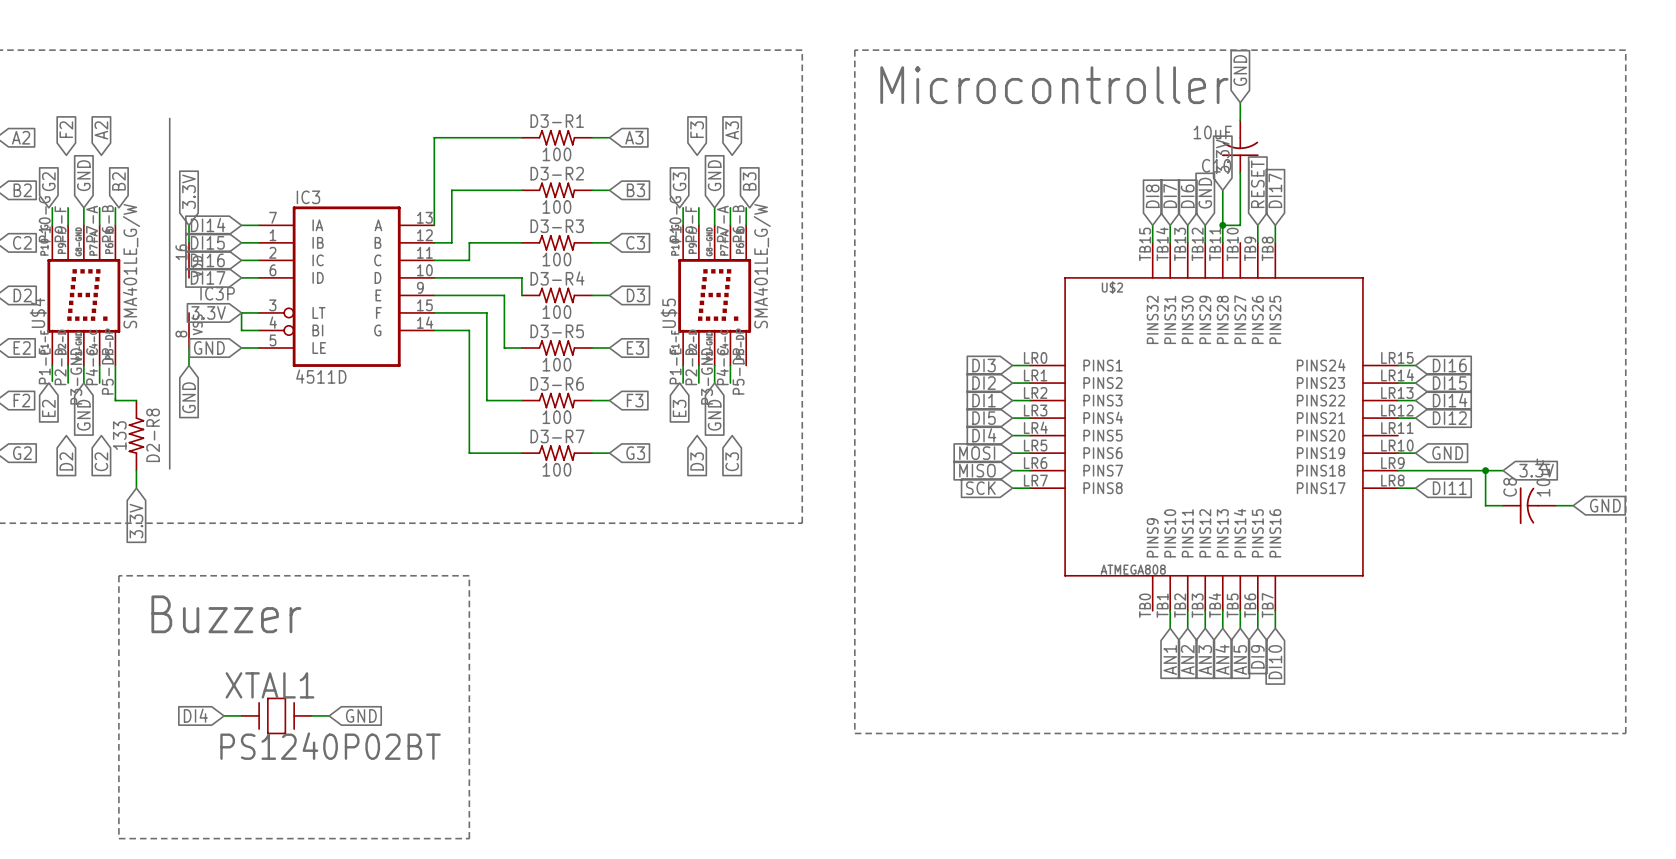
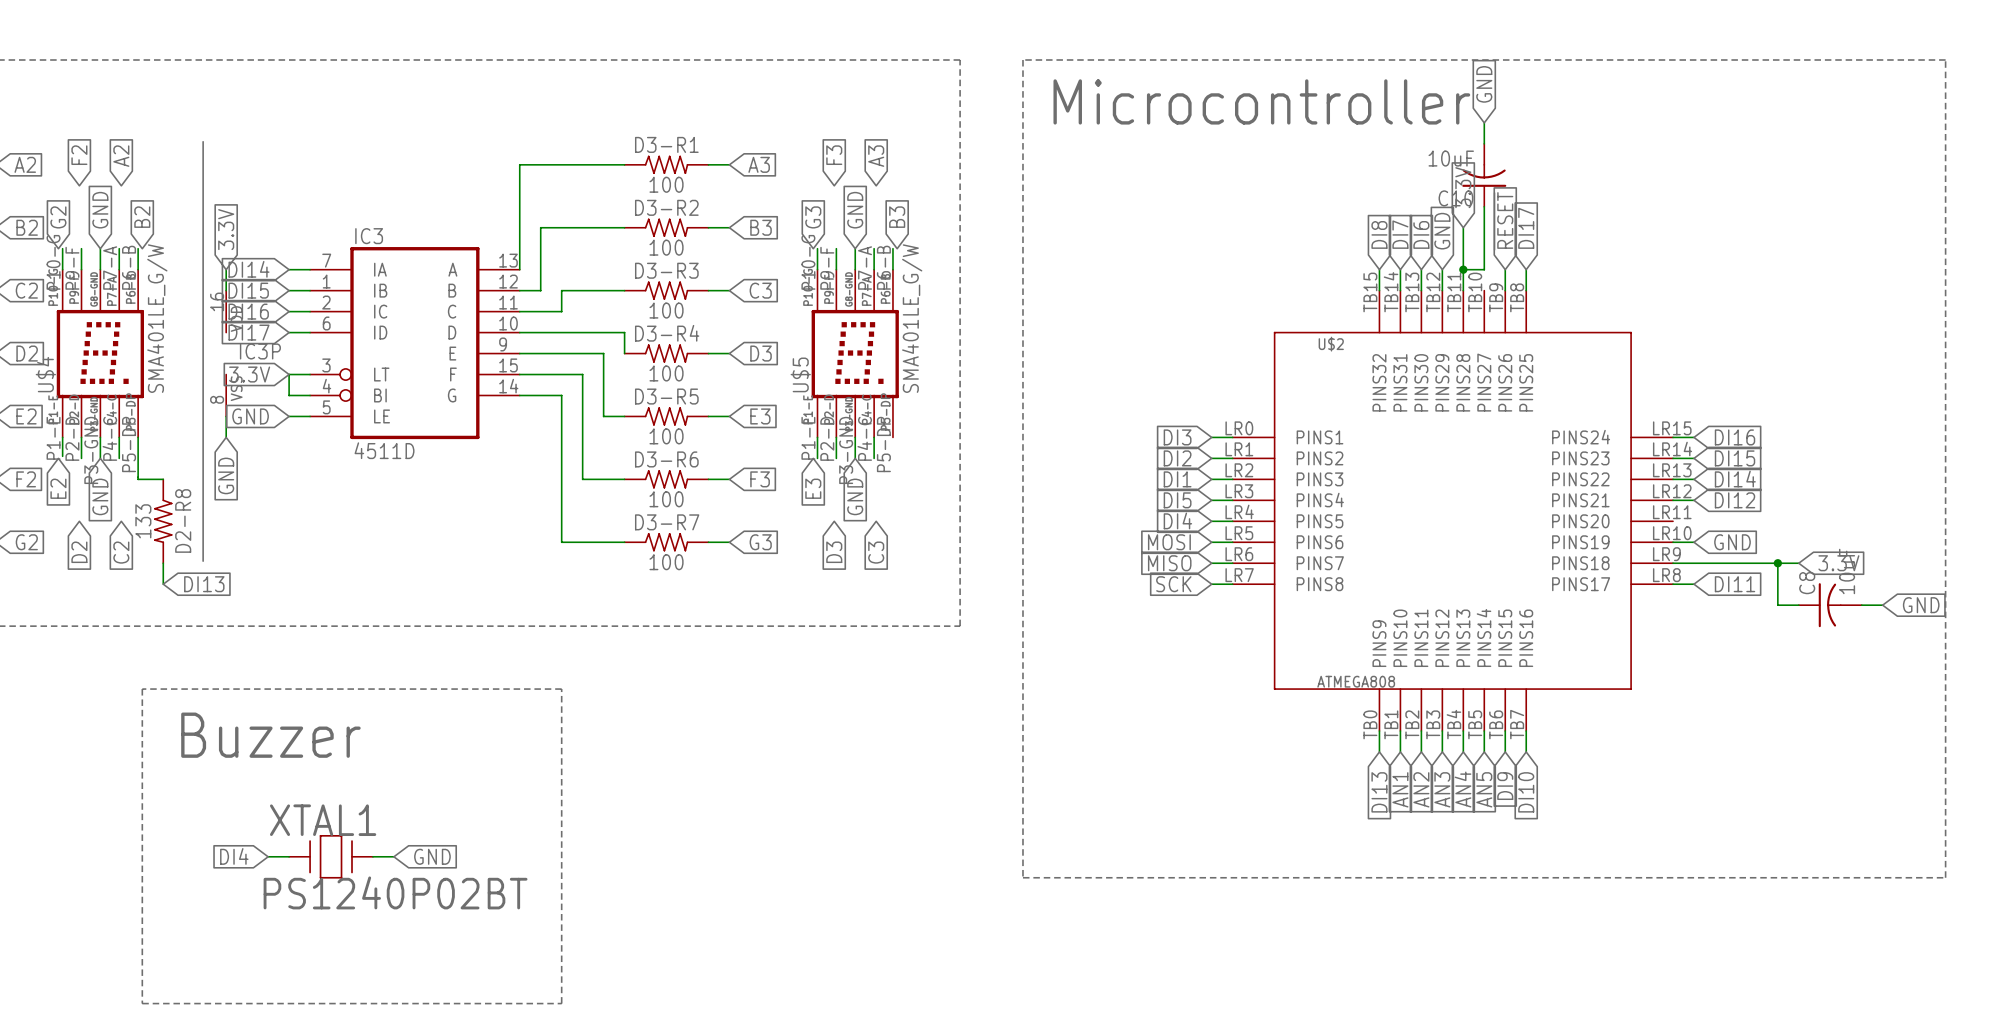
global label: 3.3V (136, 521) -> DI13 (204, 584)
wire: none -> (1379, 730) (1379, 751)
global label: none -> DI13 (1379, 792)

